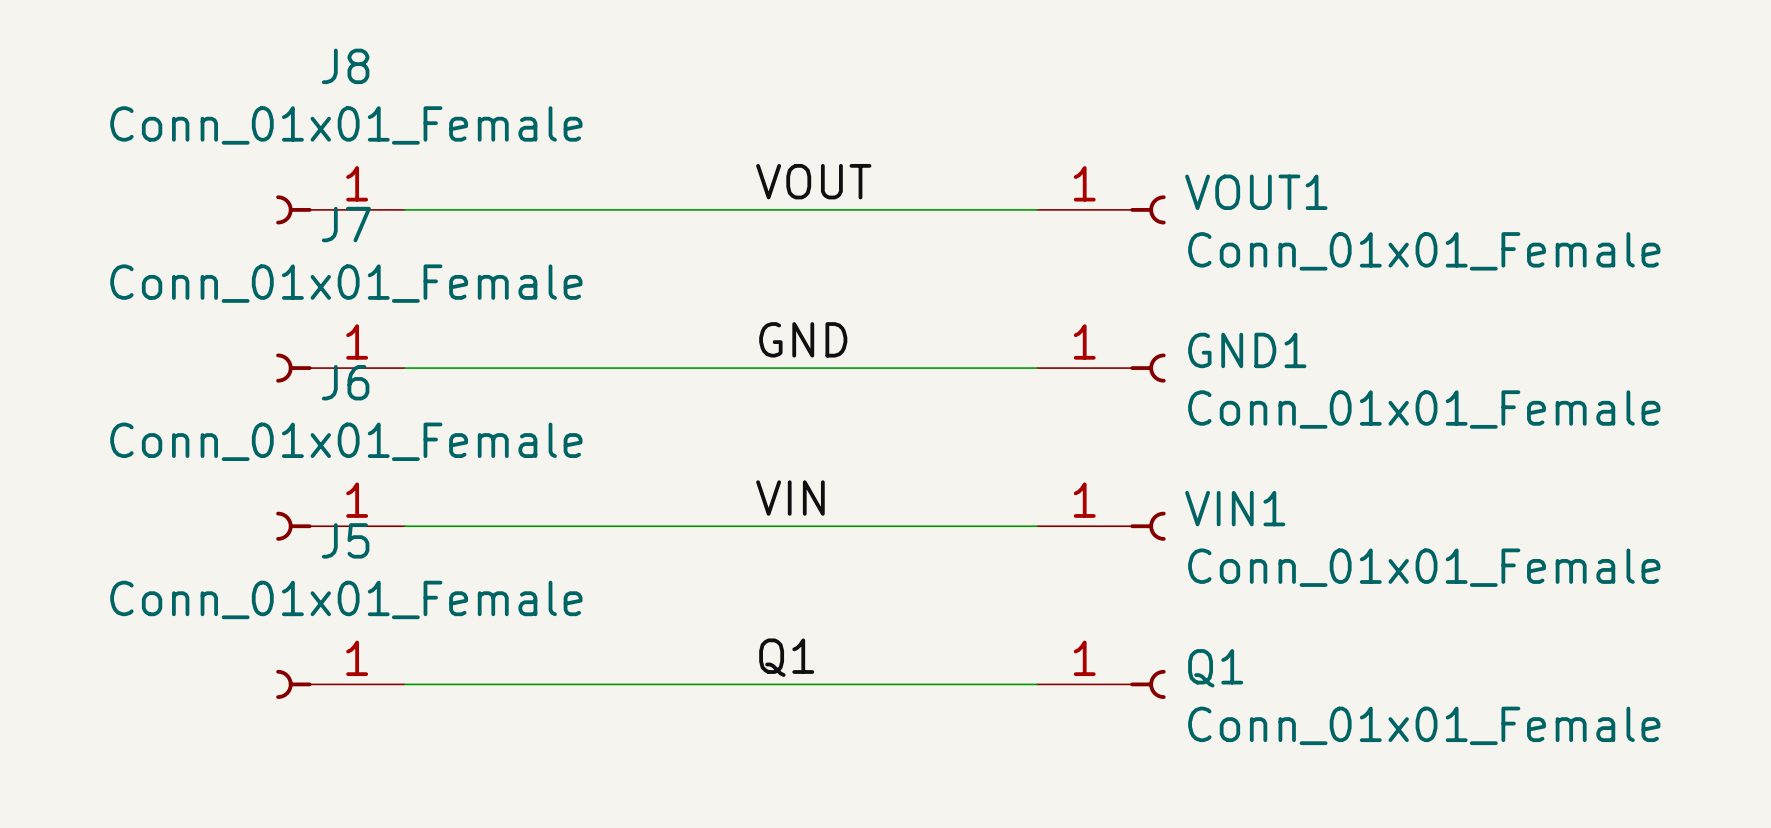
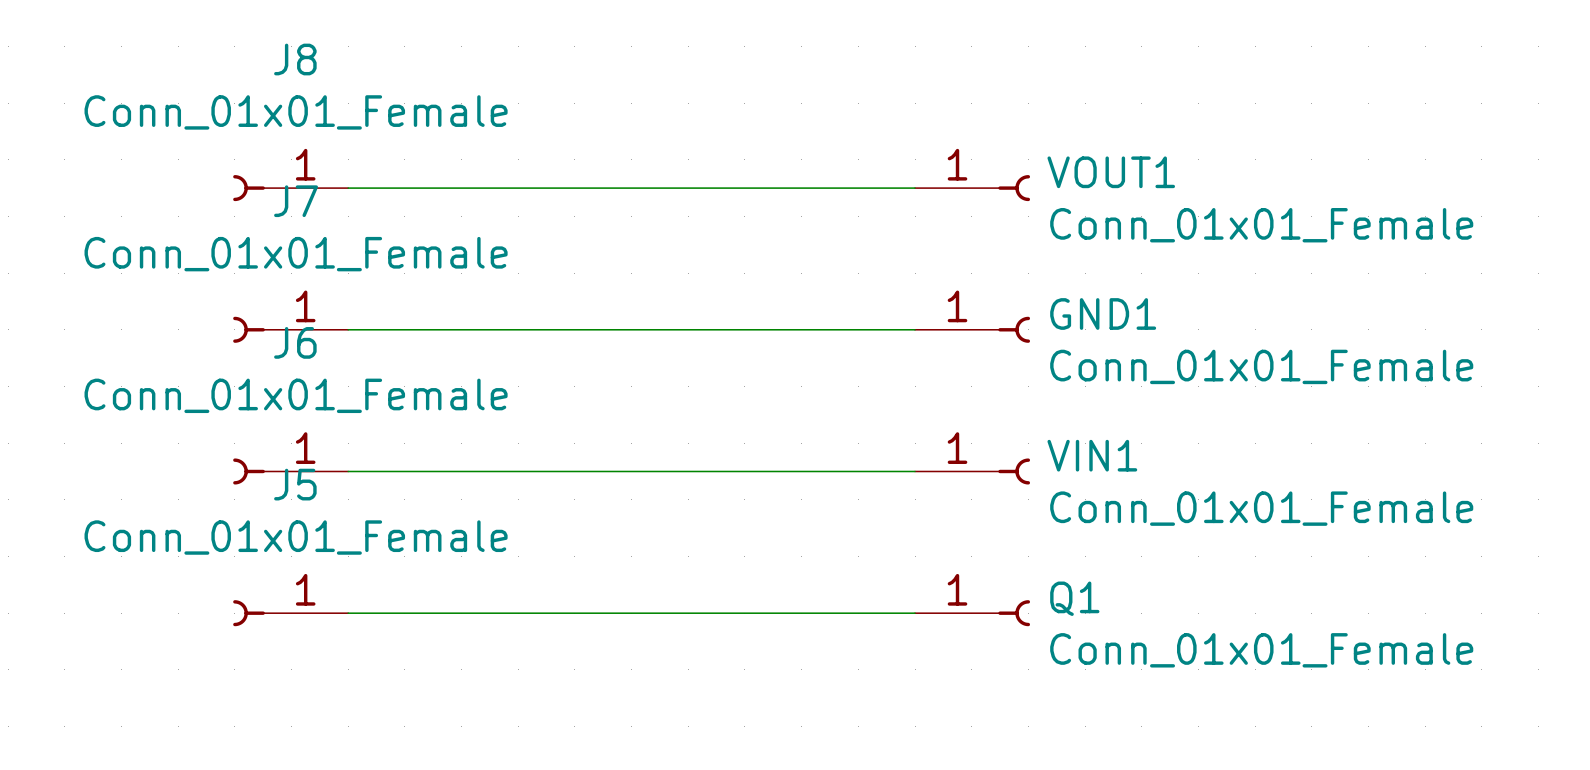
label: VOUT (813, 181) -> none
label: GND (803, 339) -> none
label: VIN (790, 498) -> none
label: Q1 (786, 657) -> none

